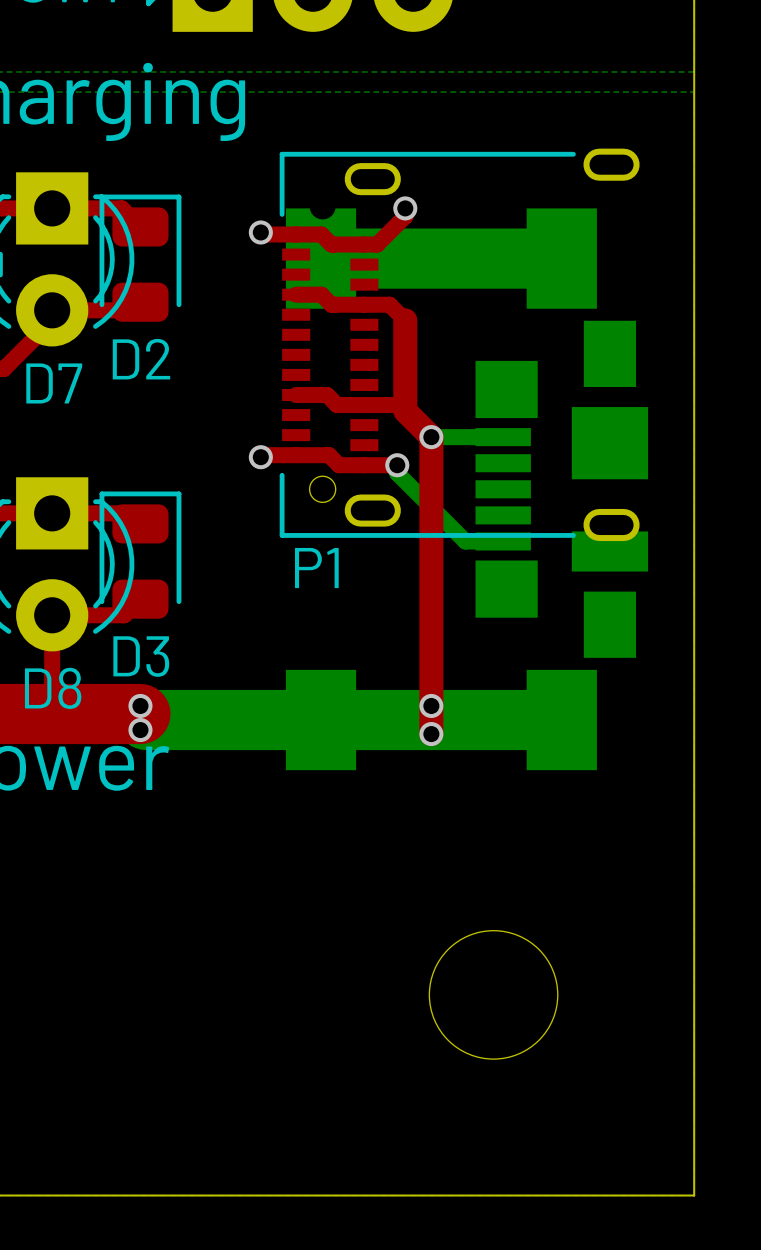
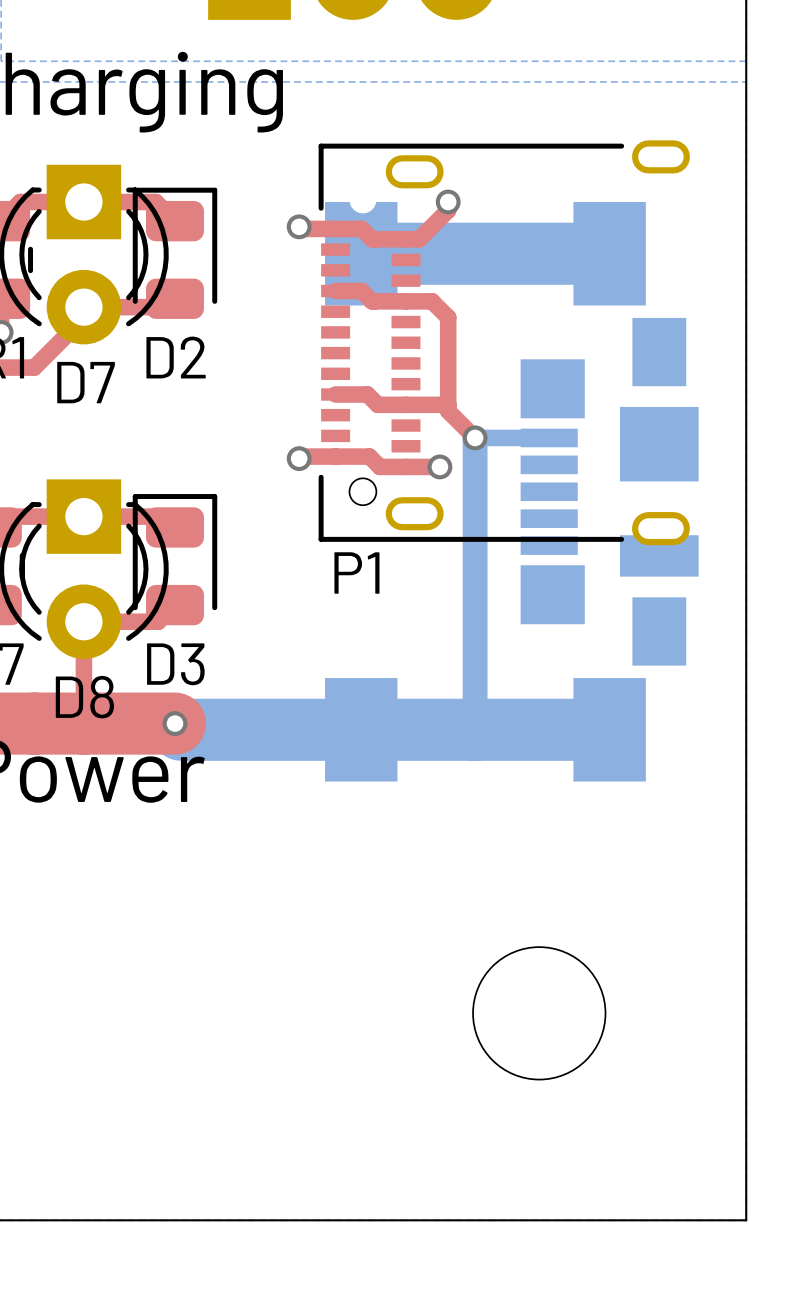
top track width: thick (405, 320) (405, 405) -> thin (448, 317) (448, 404)
top track width: thick (405, 411) (431, 437) -> thin (448, 411) (475, 437)
top track: (431, 437) (431, 734) -> none
bottom track: none -> (475, 437) (475, 729)
bottom track: (397, 465) (397, 473) (465, 541) (503, 541) -> none
via: (140, 705) -> none
via: (431, 705) -> none
via: none -> (174, 723)
via: (140, 730) -> none
via: (431, 734) -> none

